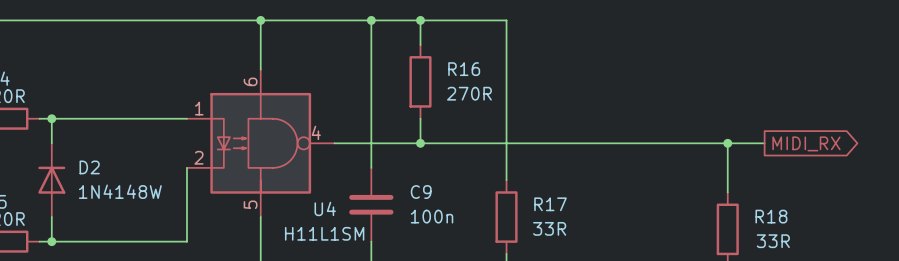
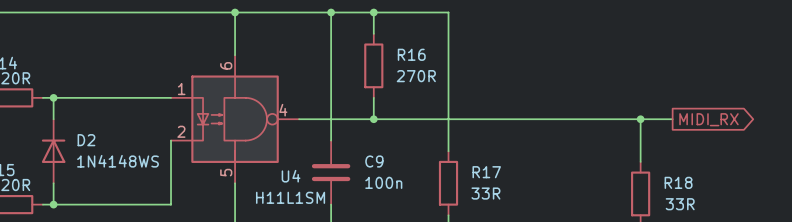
D2 value: 1N4148W (120, 191) -> 1N4148WS (117, 161)

